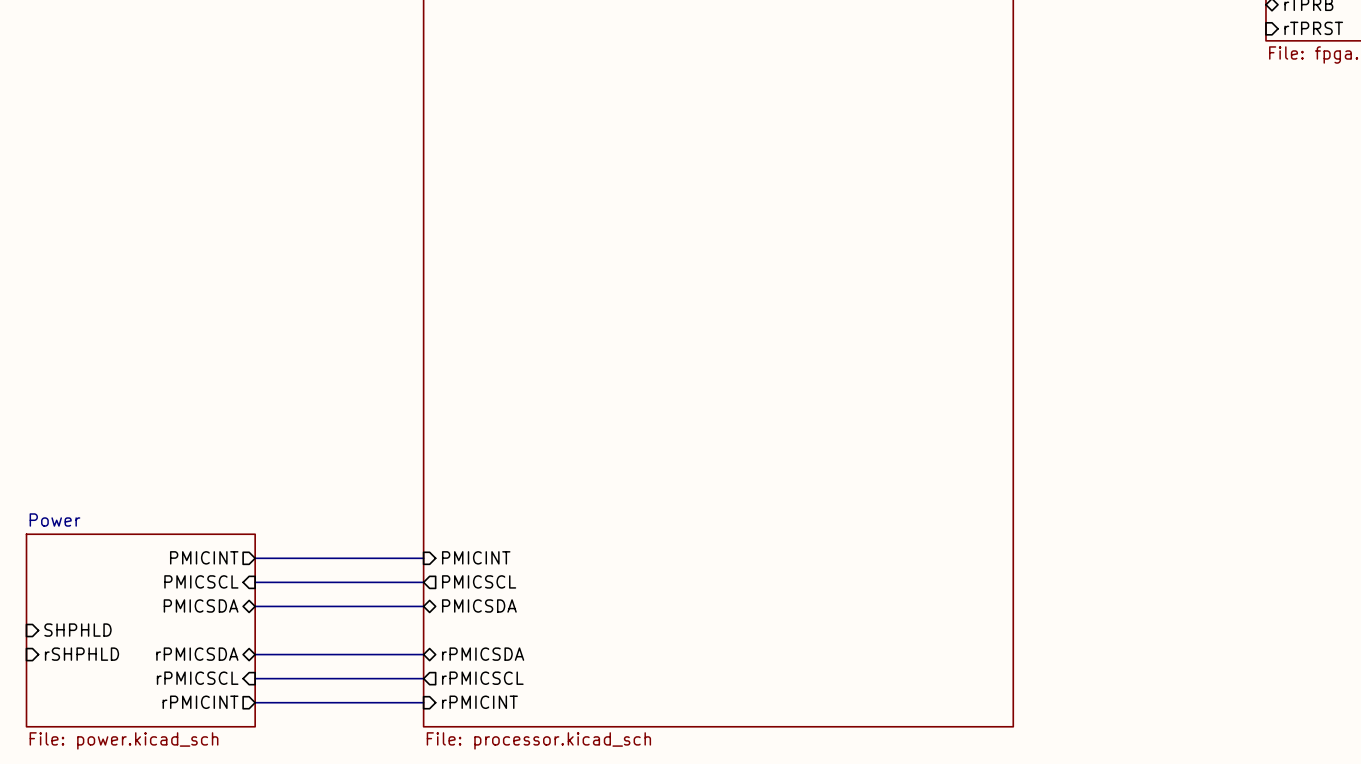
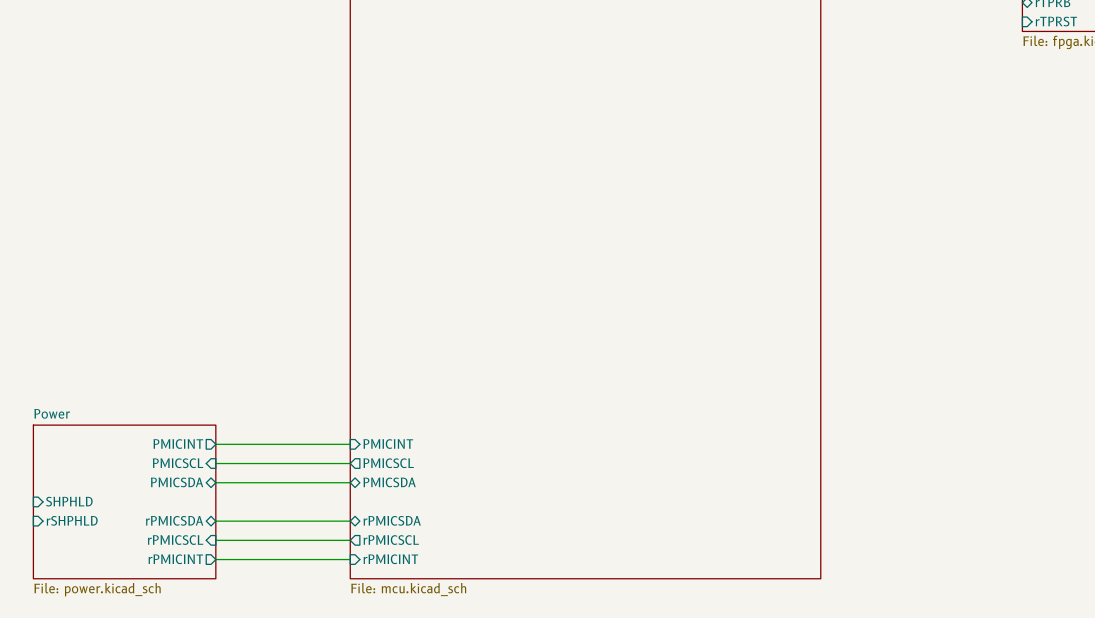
sheet value: File: processor.kicad_sch (538, 740) -> File: mcu.kicad_sch (408, 589)

